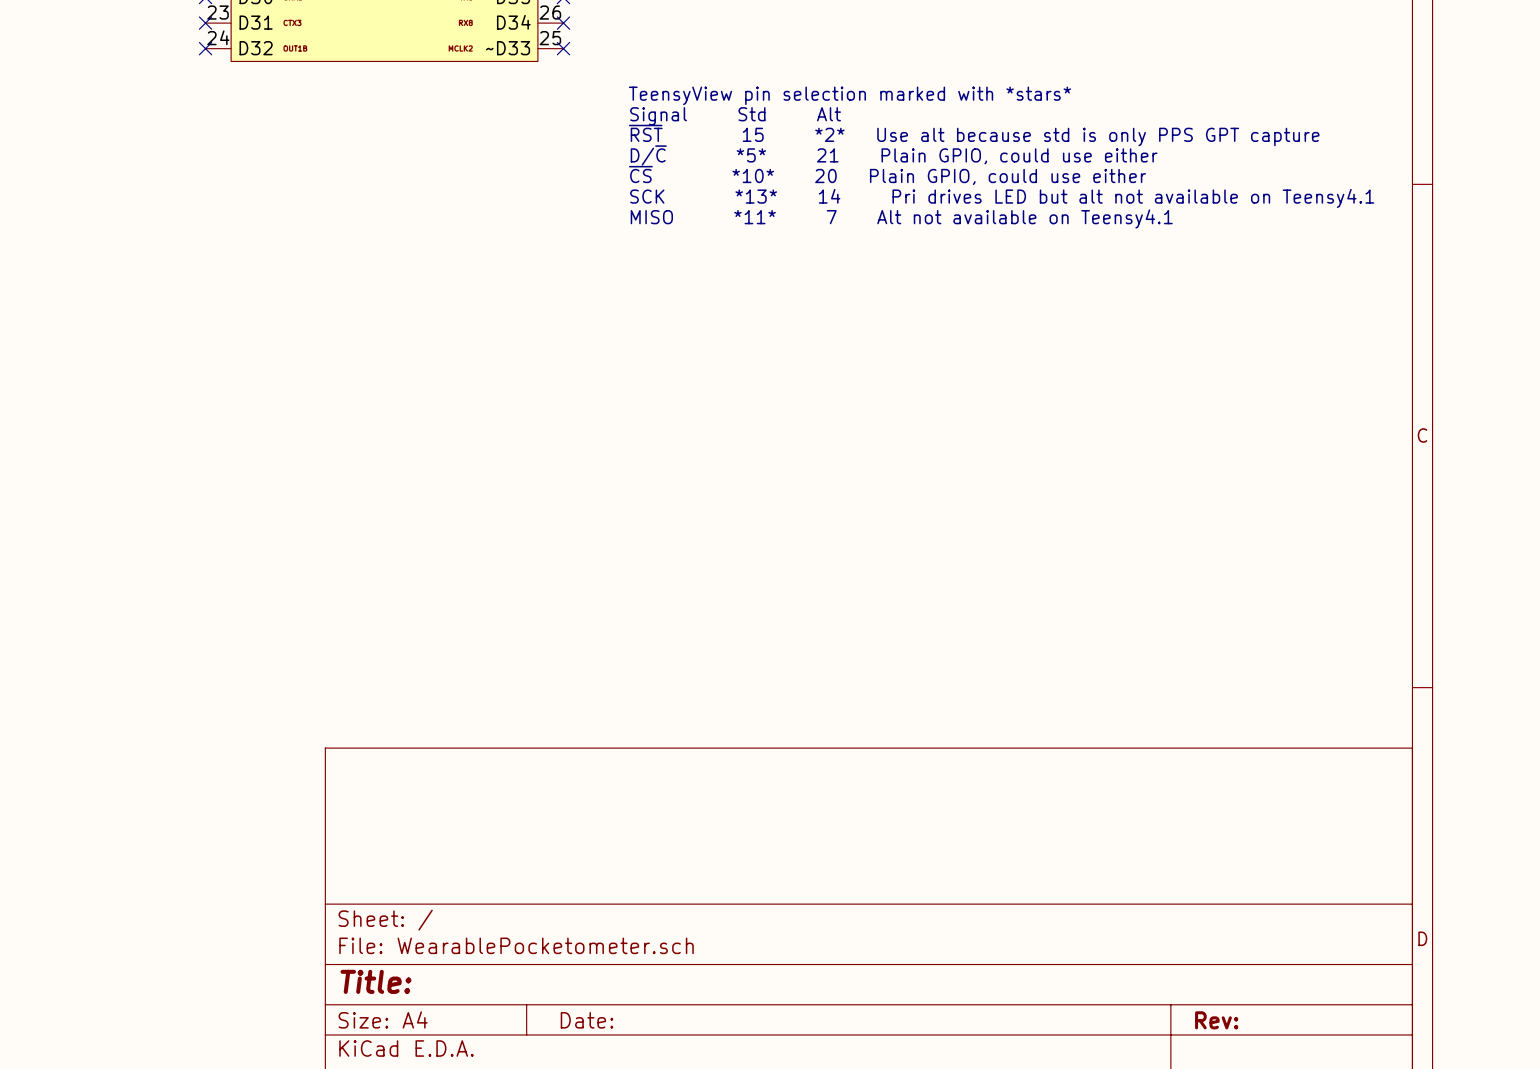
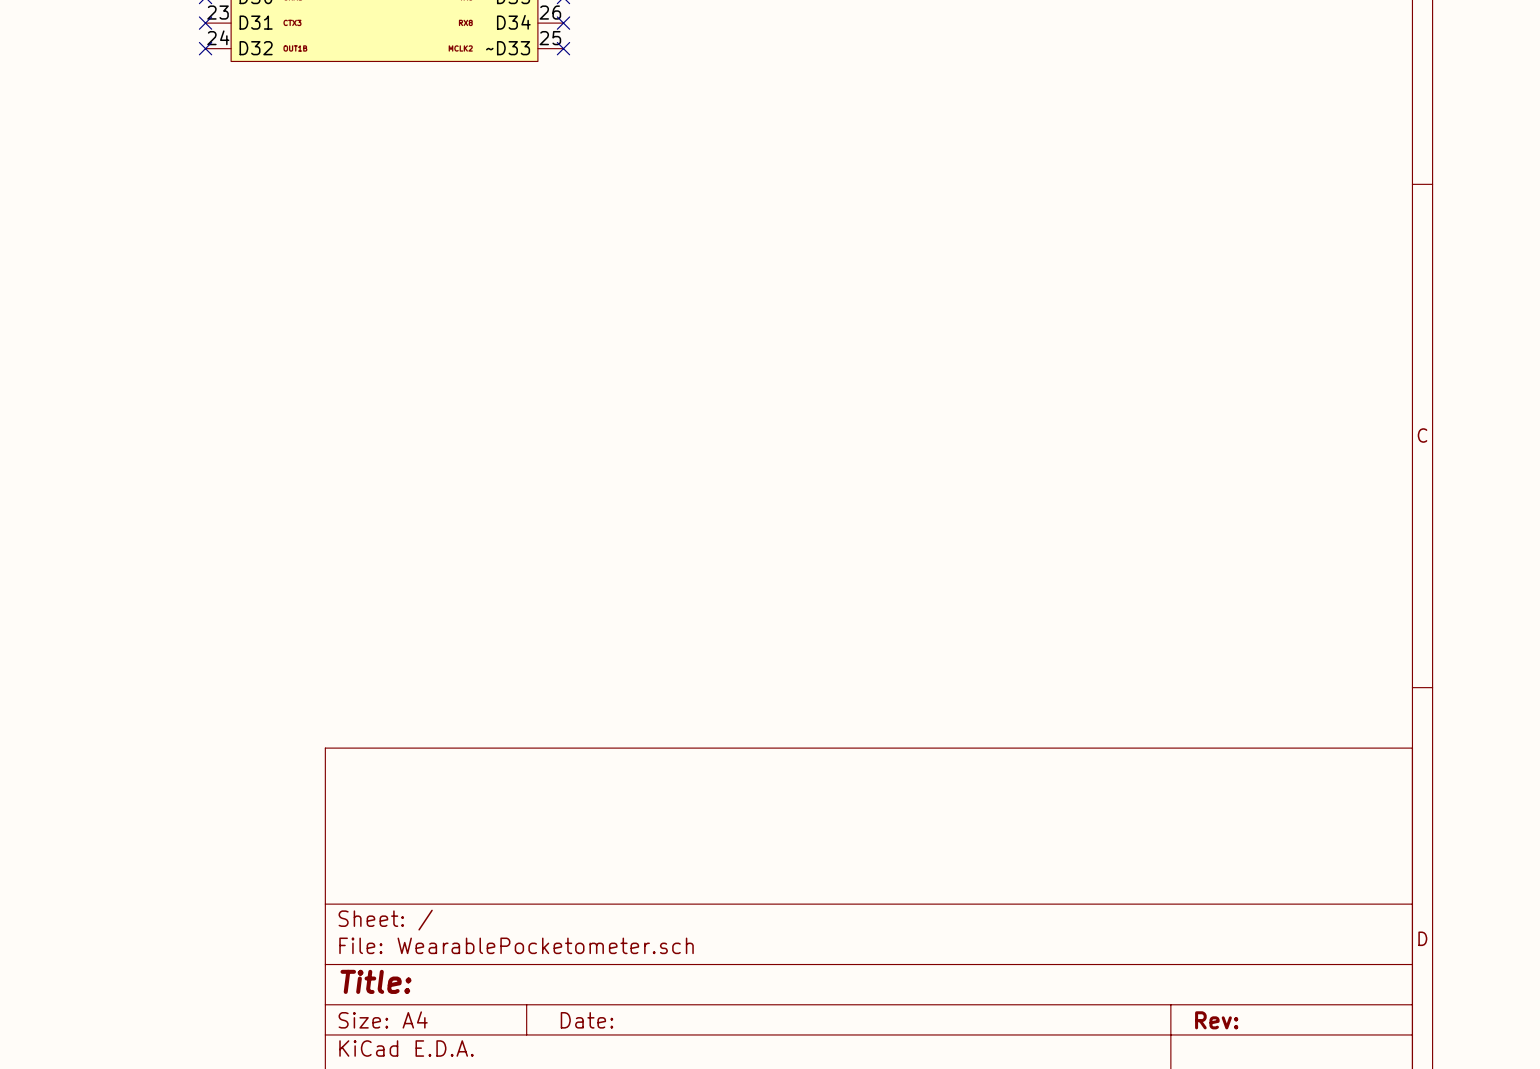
text: TeensyView pin selection marked with *stars* (849, 95) -> none
text: Signal Std Alt (735, 116) -> none
text: ~{RST} 15 *2* Use alt because std is only PPS GPT capture (974, 135) -> none
text: D/~{C} *5* 21 Plain GPIO, could use either (894, 155) -> none
text: ~{CS} *10* 20 Plain GPIO, could use either (887, 175) -> none
text: SCK *13* 14 Pri drives LED but alt not available on Teensy4.1 (1002, 198) -> none
text: MISO *11* 7 Alt not available on Teensy4.1 (901, 218) -> none

